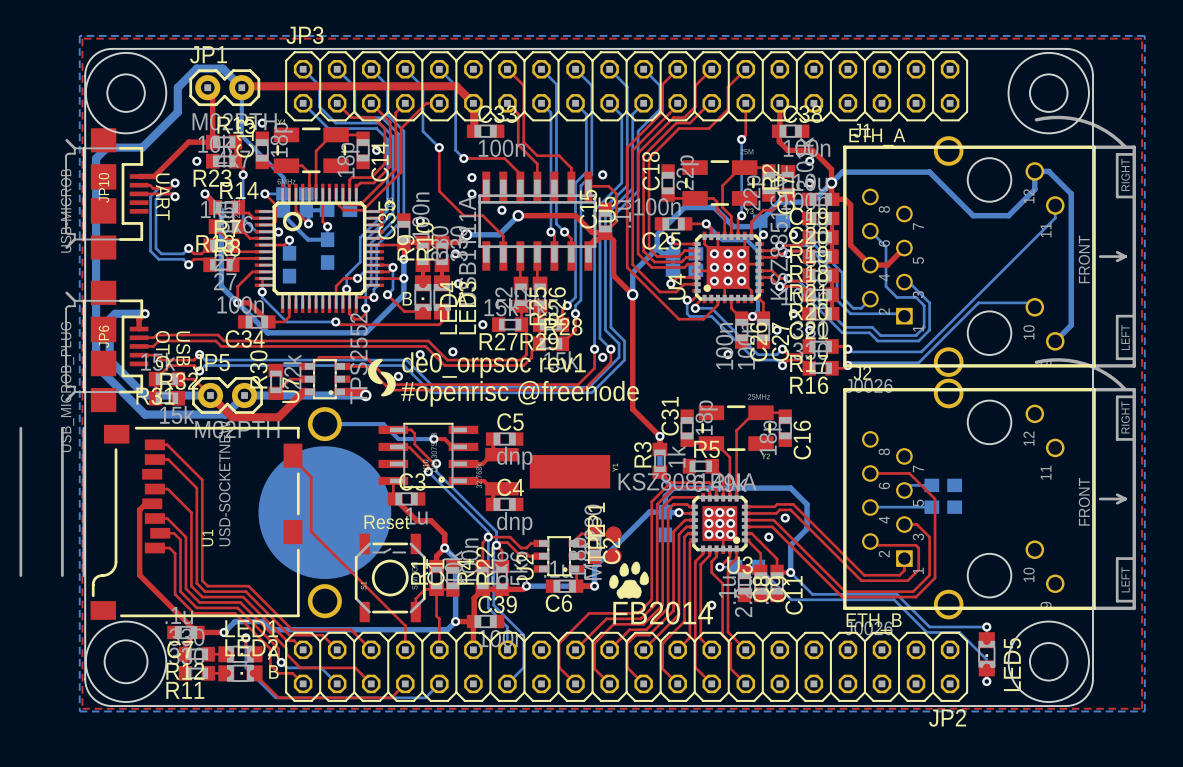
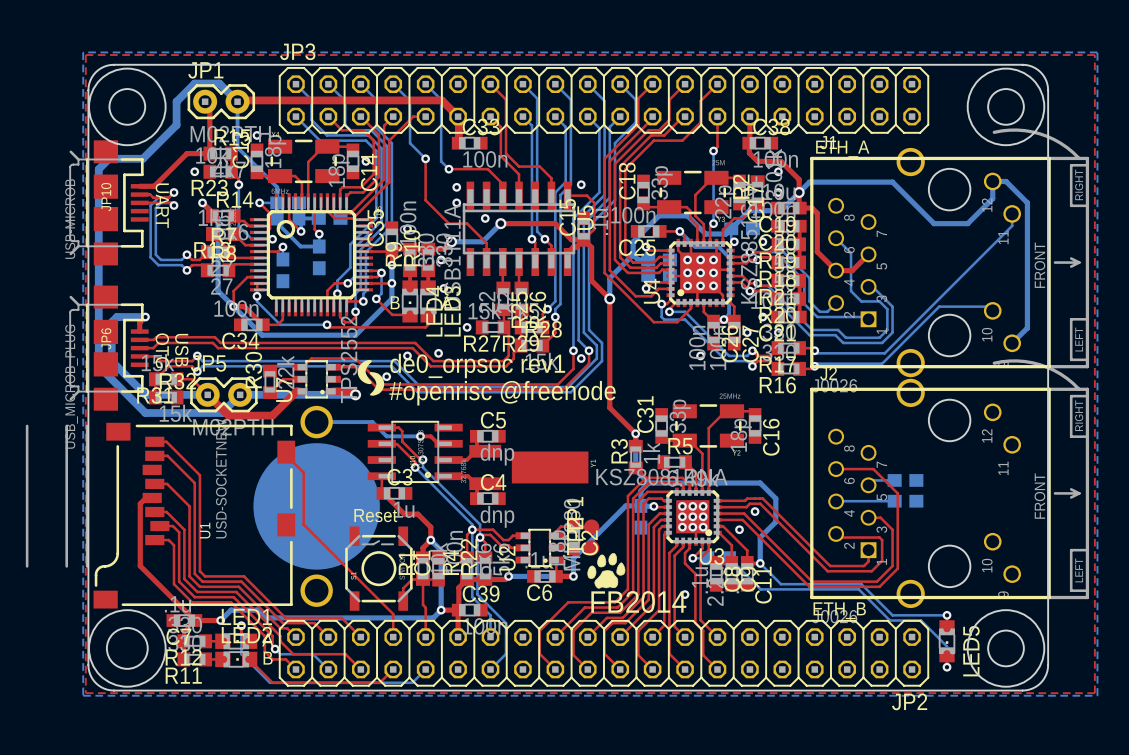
C18 value: 22p (687, 172) -> 33p (662, 182)
C31 value: 18p (706, 417) -> 33p (680, 416)

